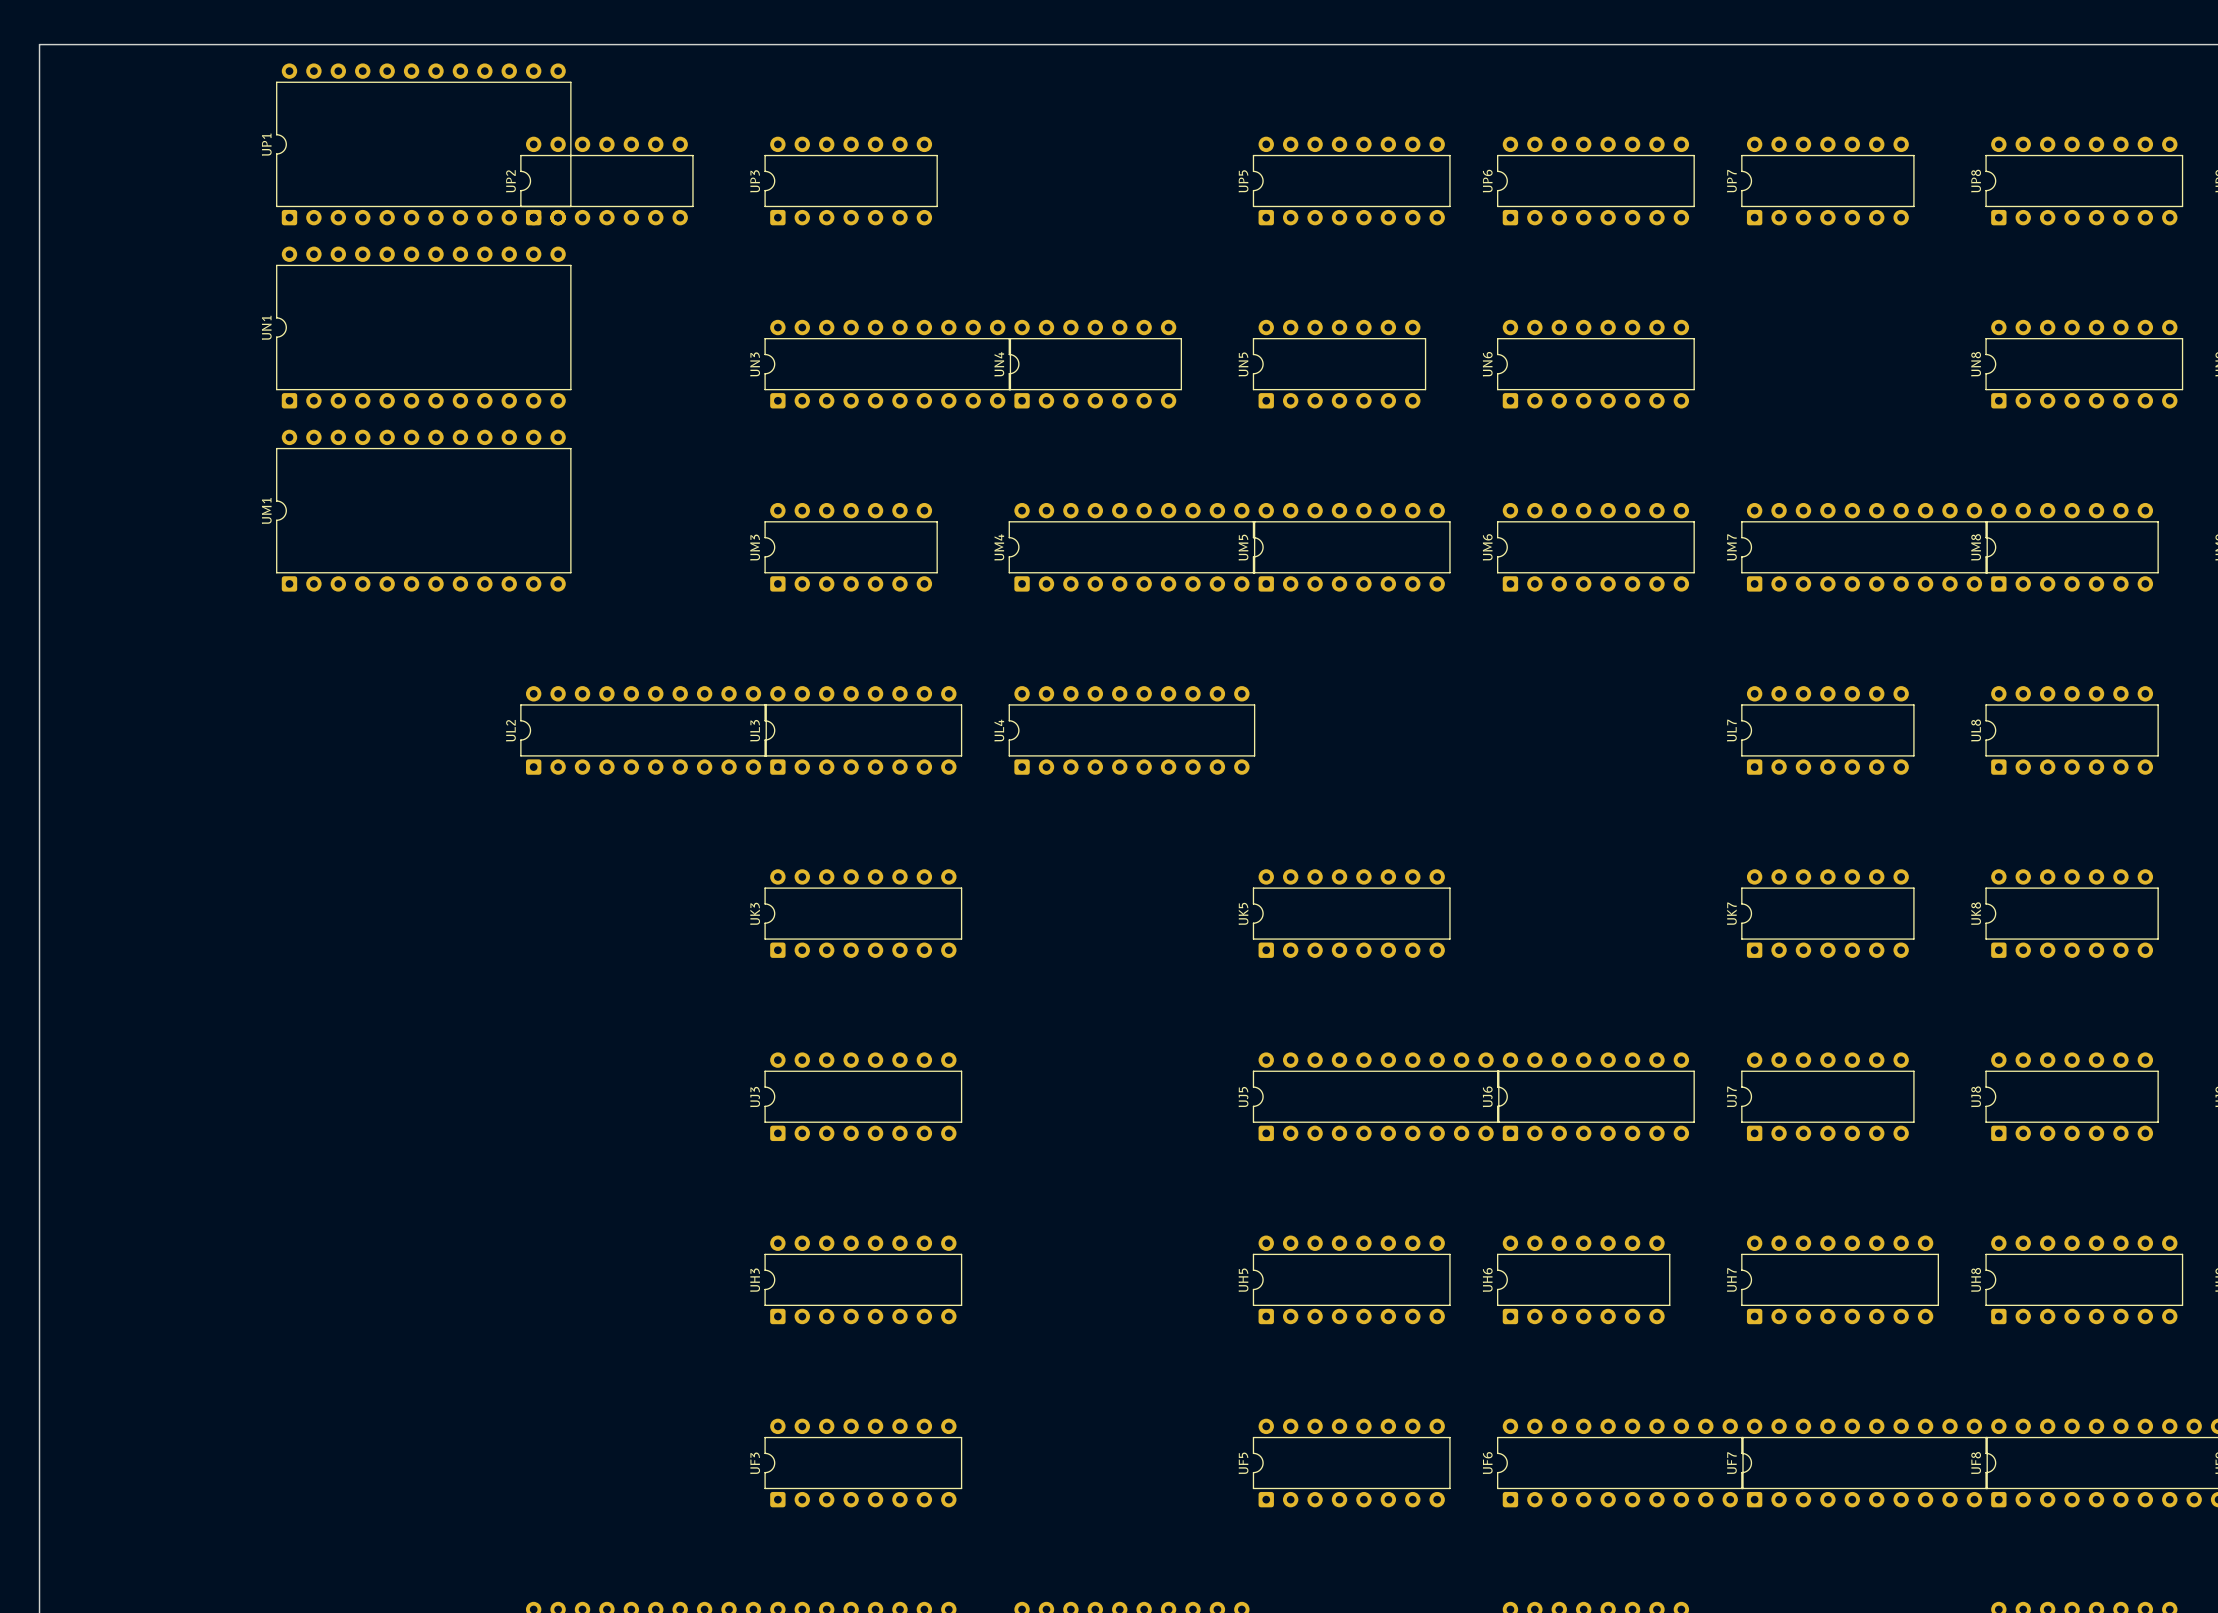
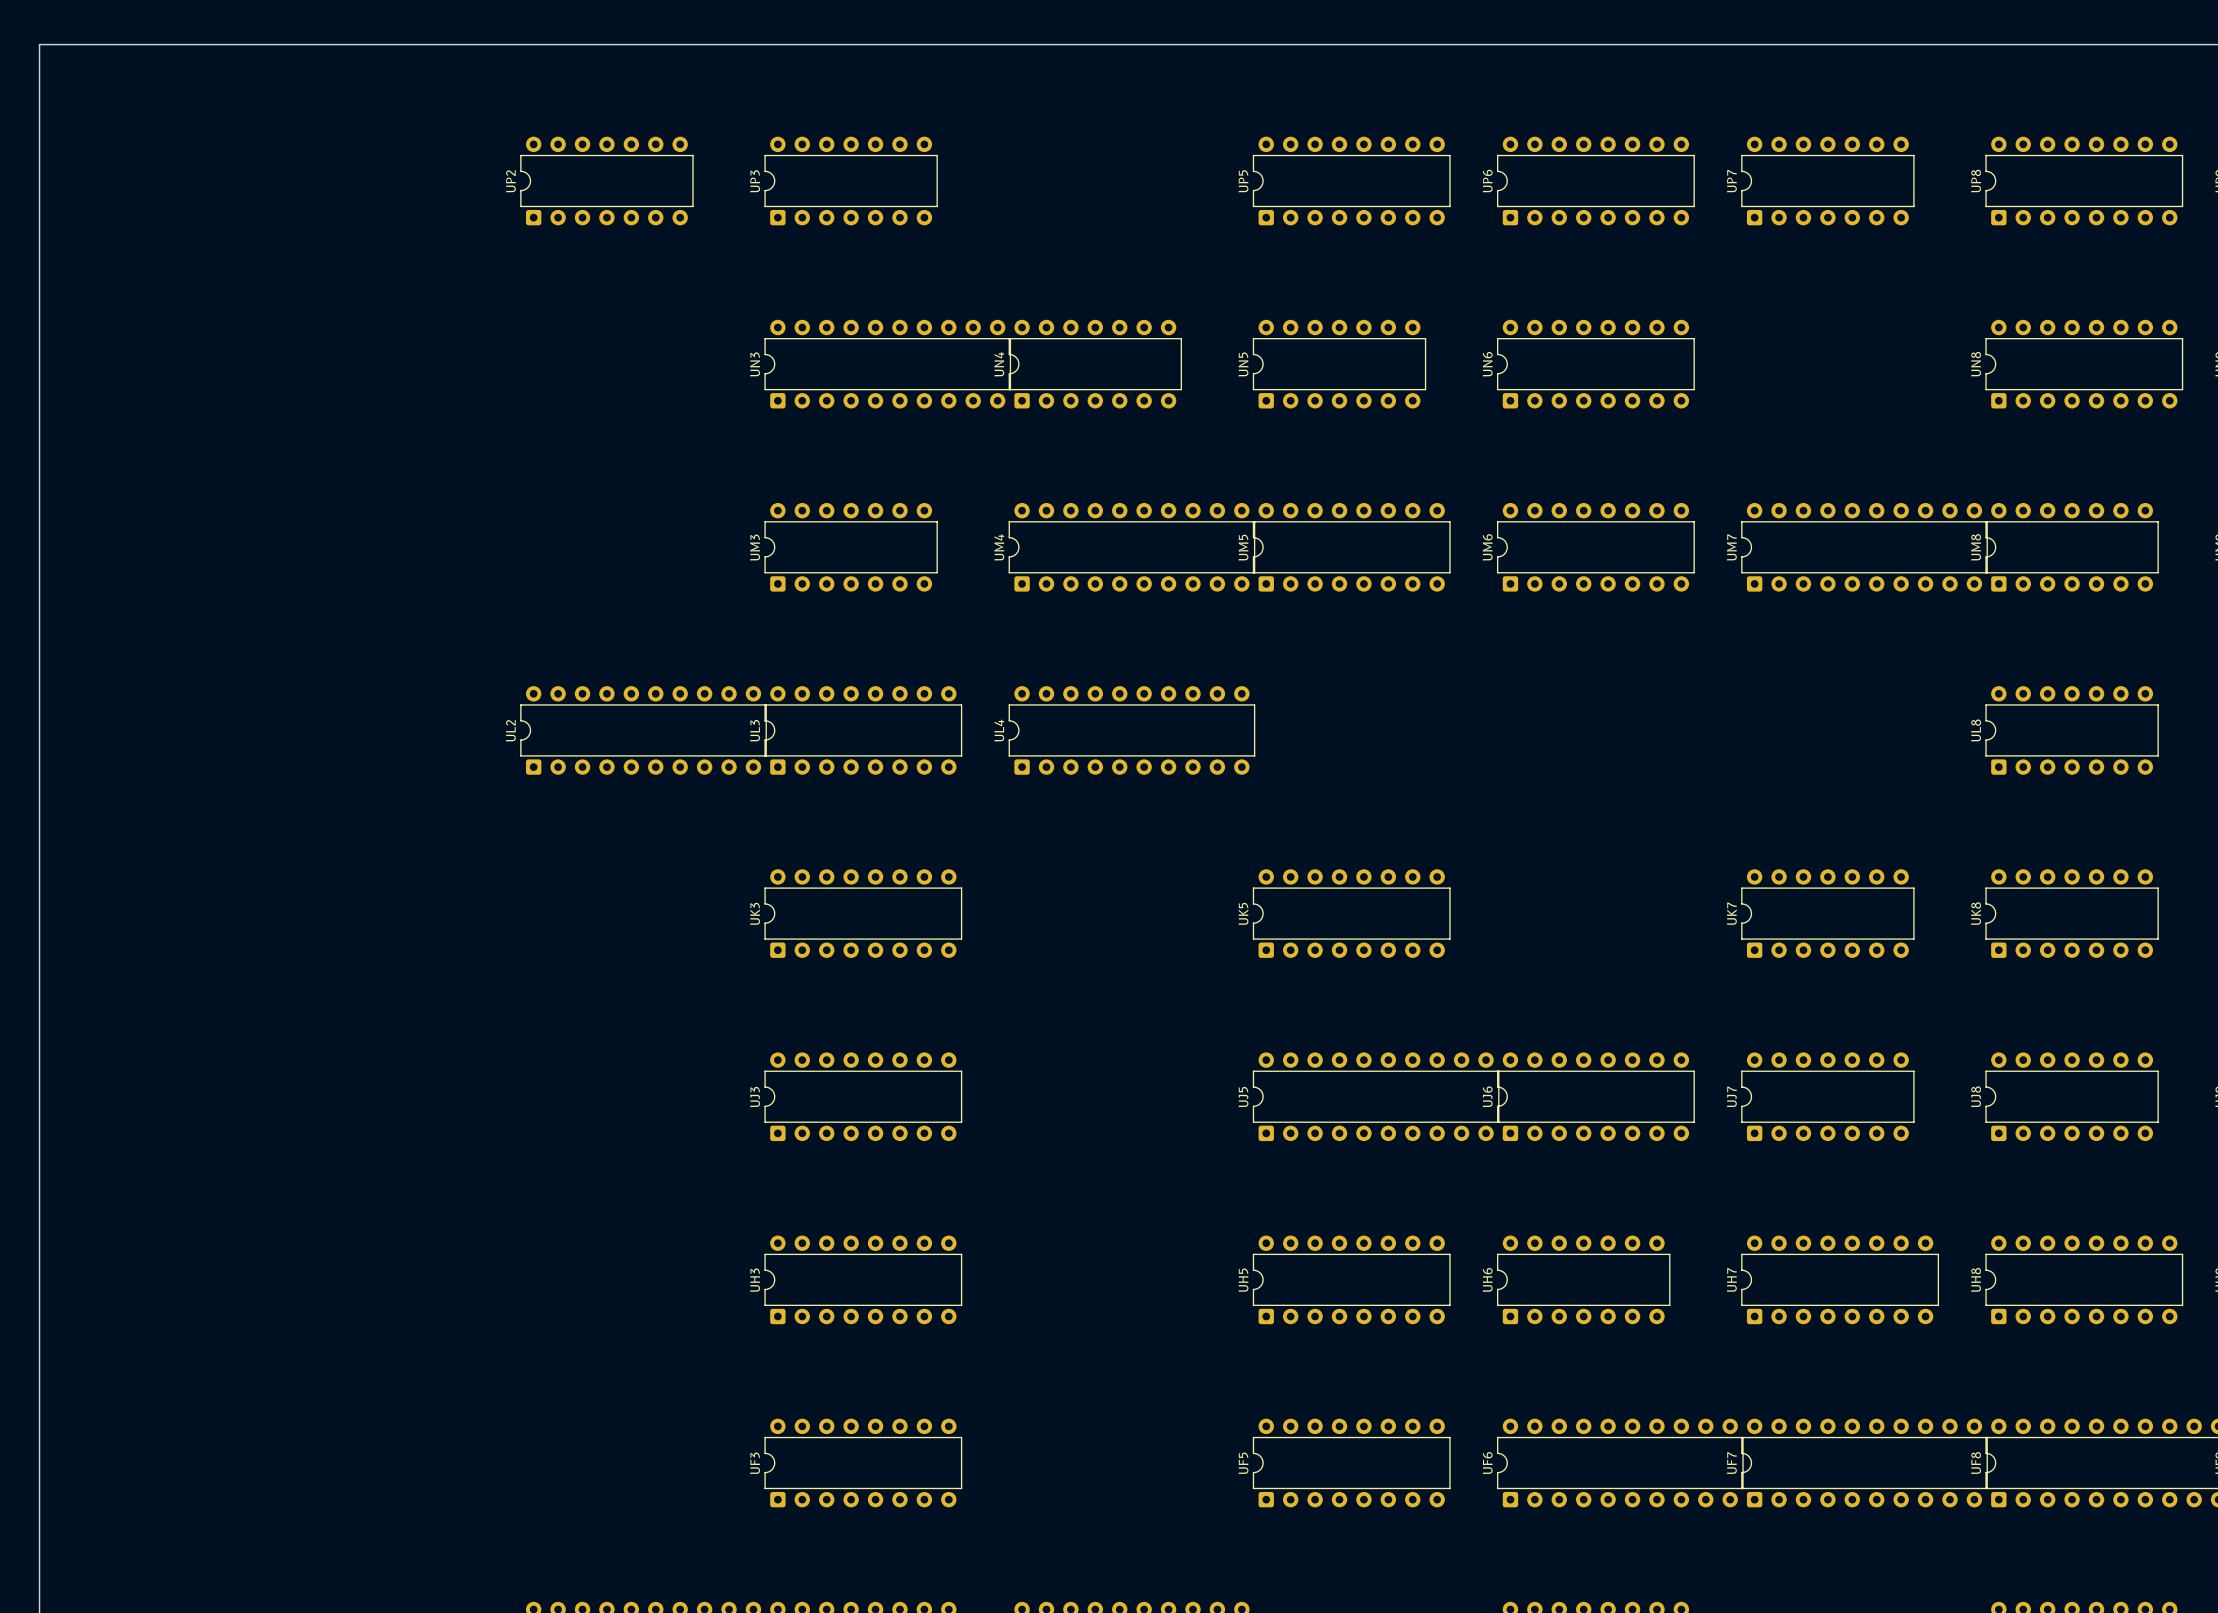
UP1: (423, 144) -> none
UN1: (423, 327) -> none
UM1: (423, 510) -> none
UL7: (1827, 730) -> none

